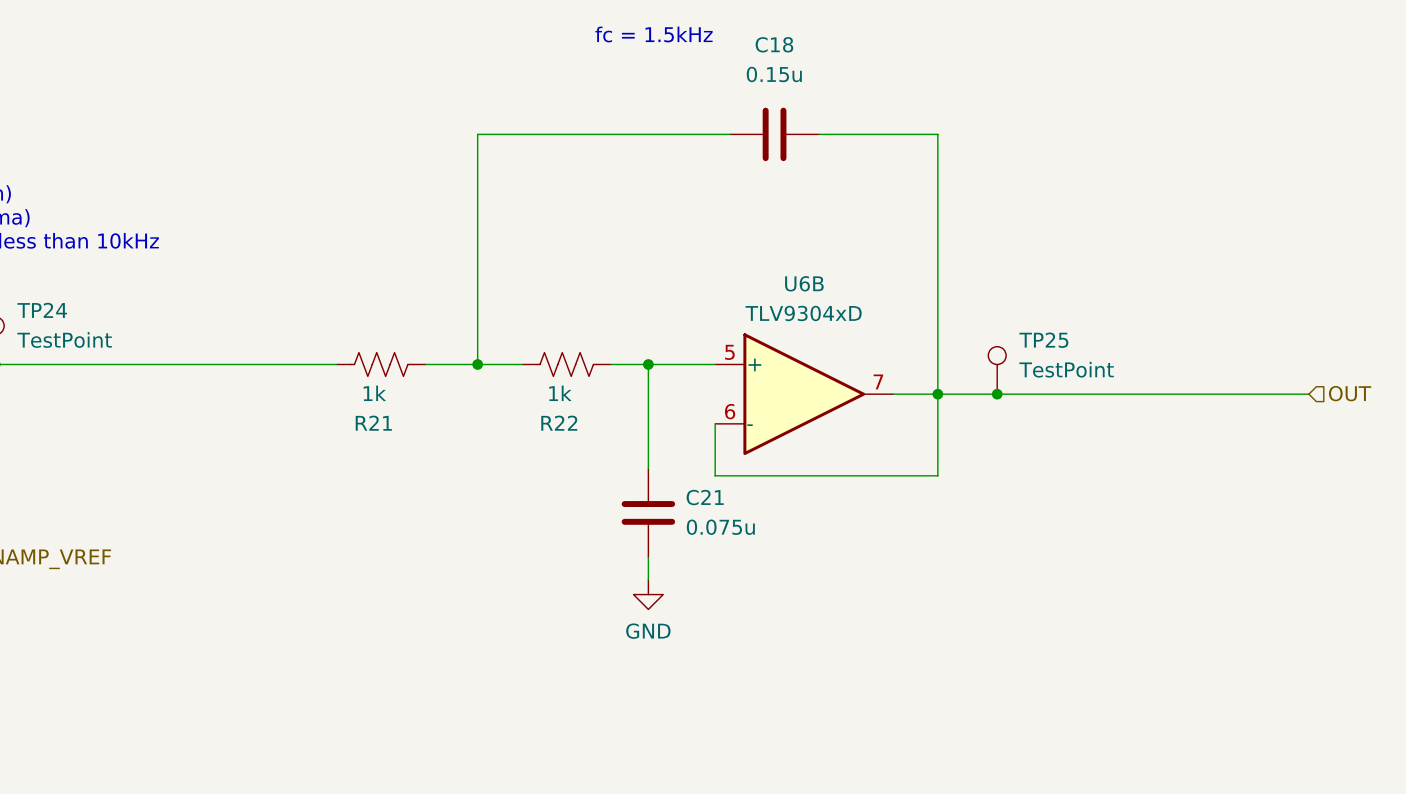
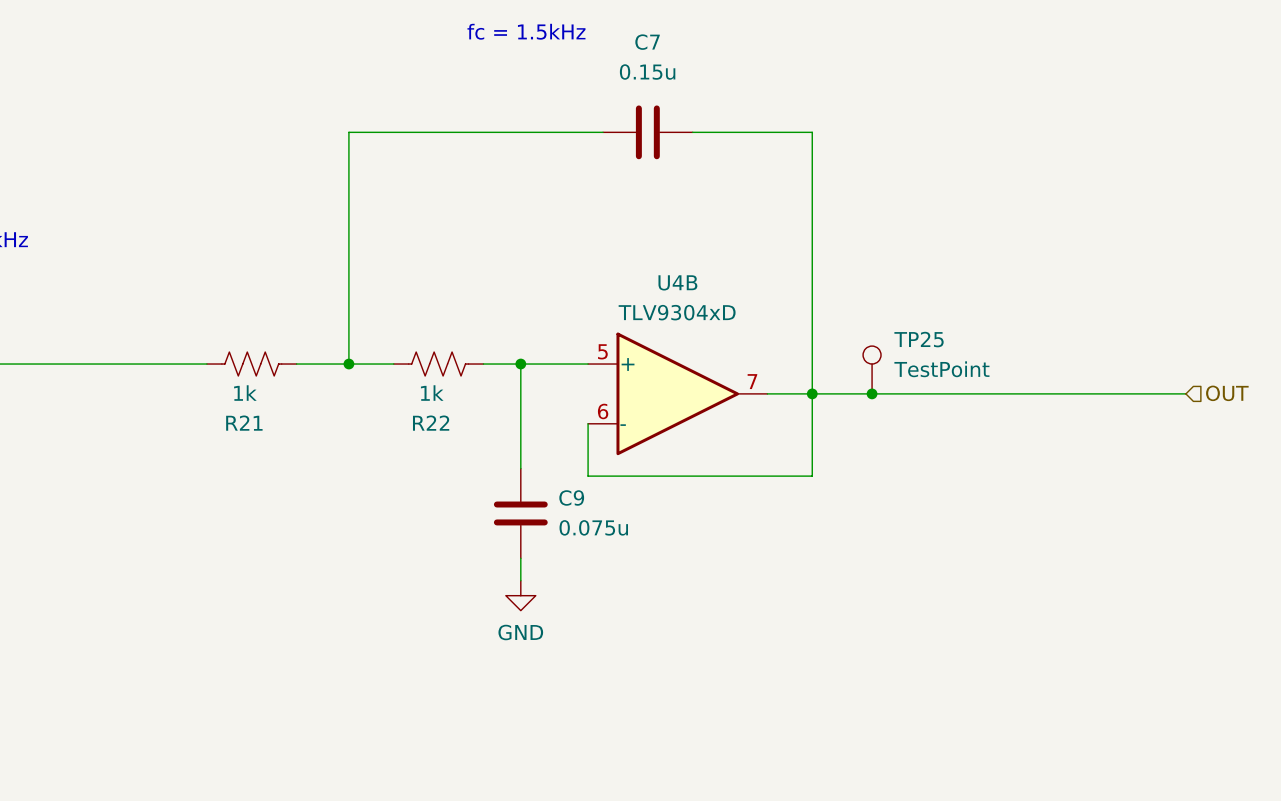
C18 name: C18 (774, 44) -> C7 (647, 42)
U6B name: U6B (804, 283) -> U4B (677, 282)
C21 name: C21 (705, 497) -> C9 (571, 497)

